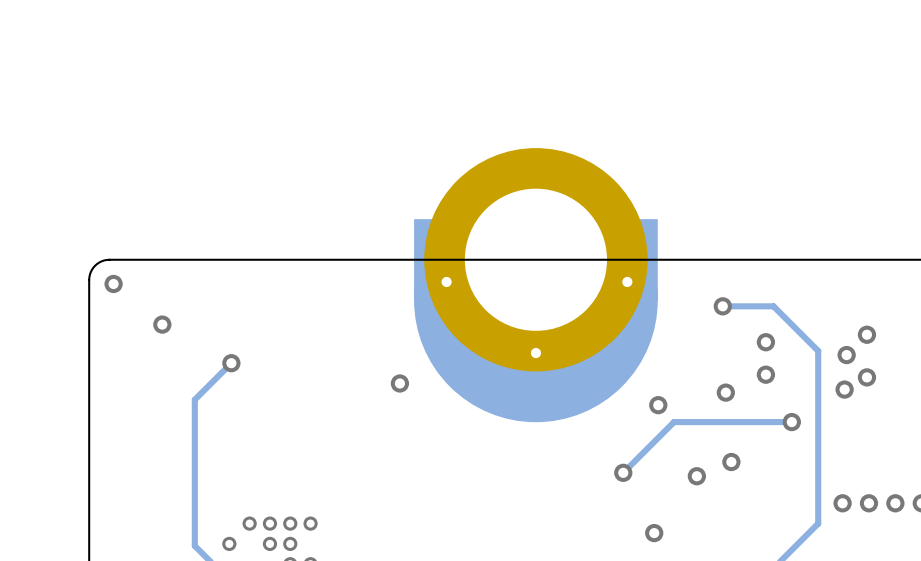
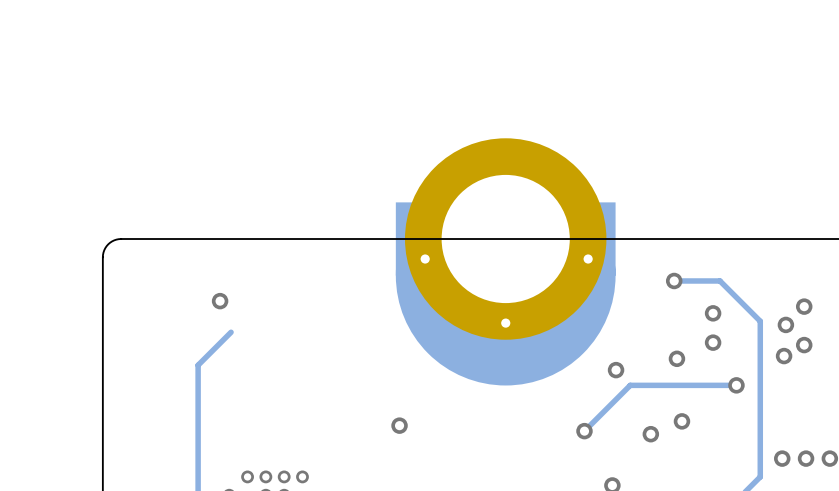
via: (113, 283) -> none
via: (162, 324) -> none
via: none -> (220, 301)
via: (231, 363) -> none
via position: (399, 383) -> (399, 425)

